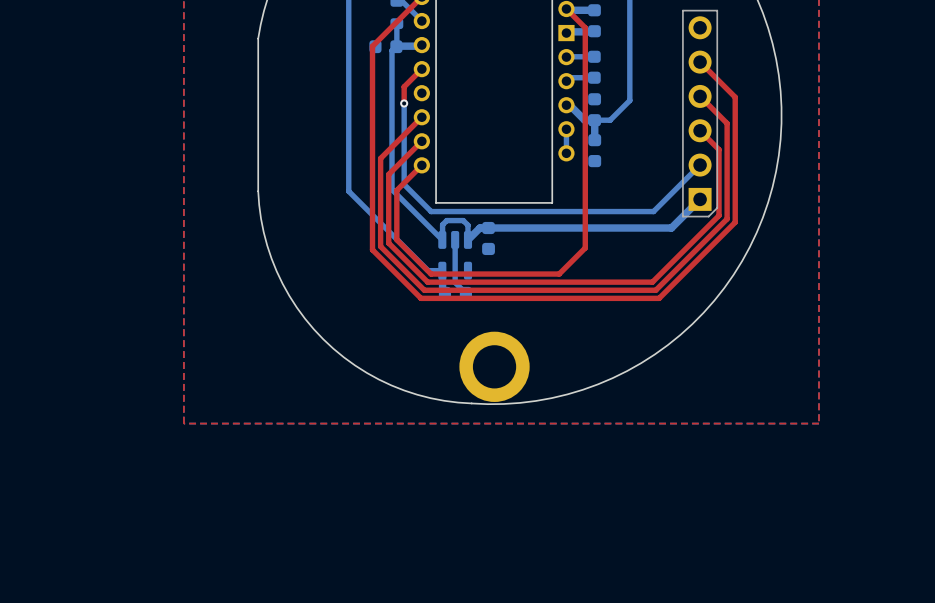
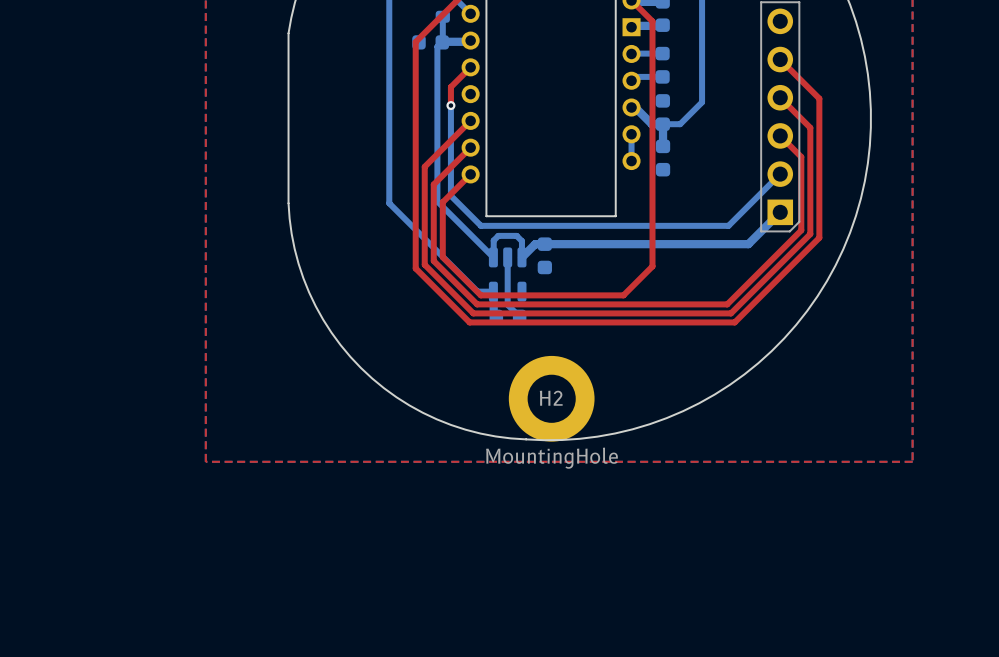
part: (494, 366) -> none
H2: none -> MountingHole (551, 398)

